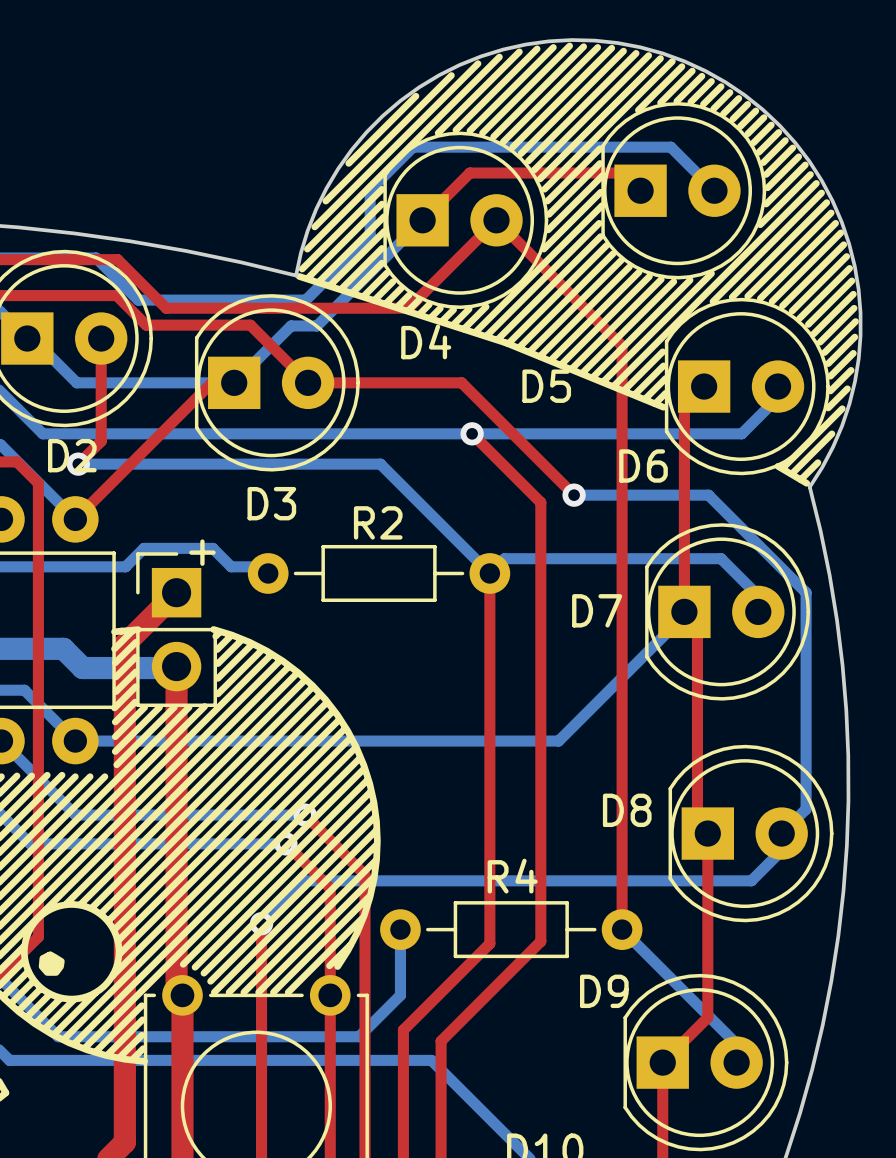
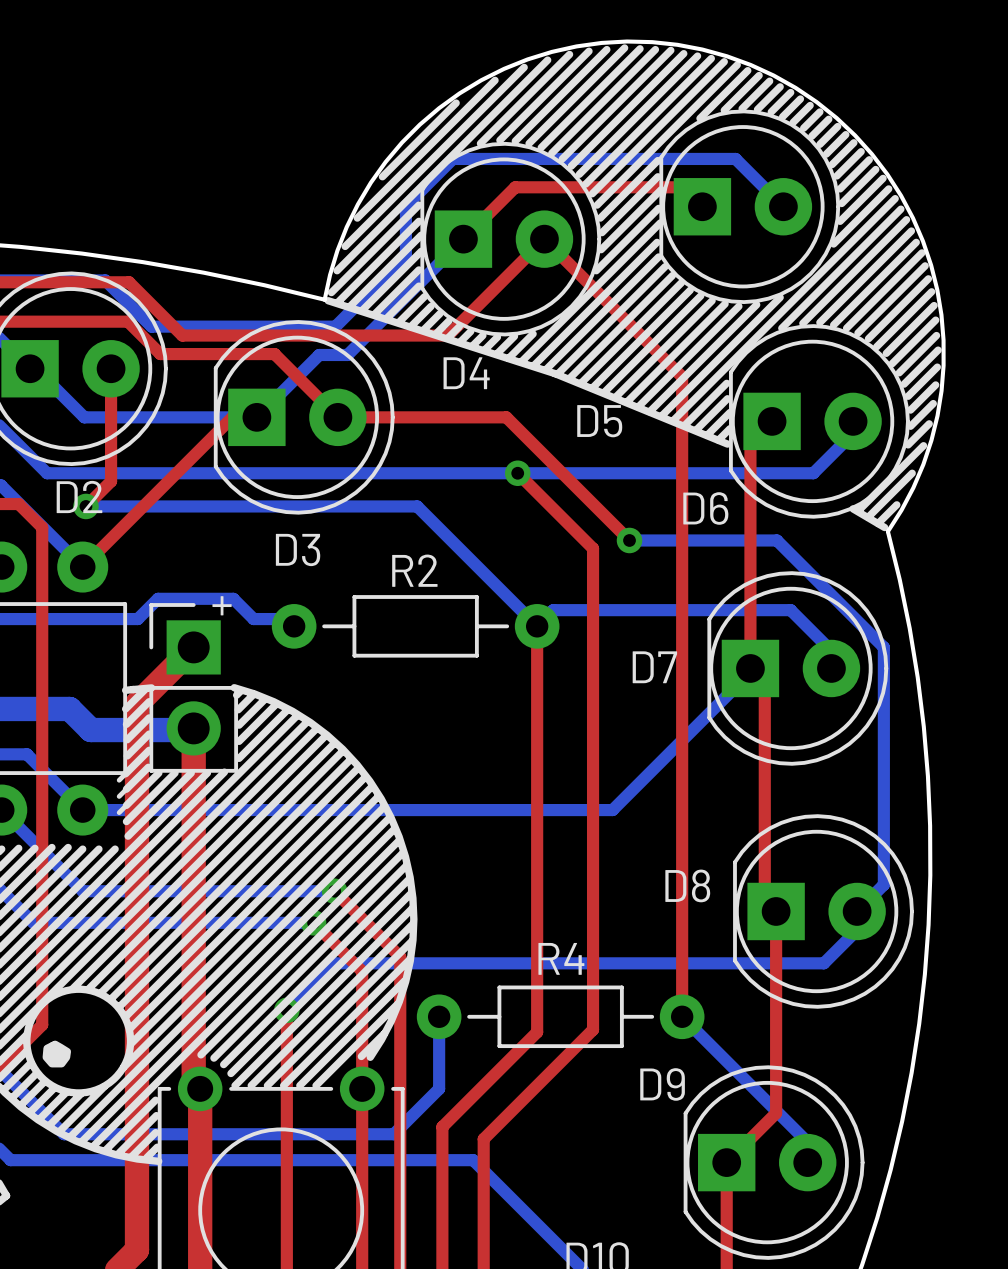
line: none -> (125, 773) (119, 780)
line: none -> (126, 789) (119, 796)
line: none -> (126, 805) (119, 812)

